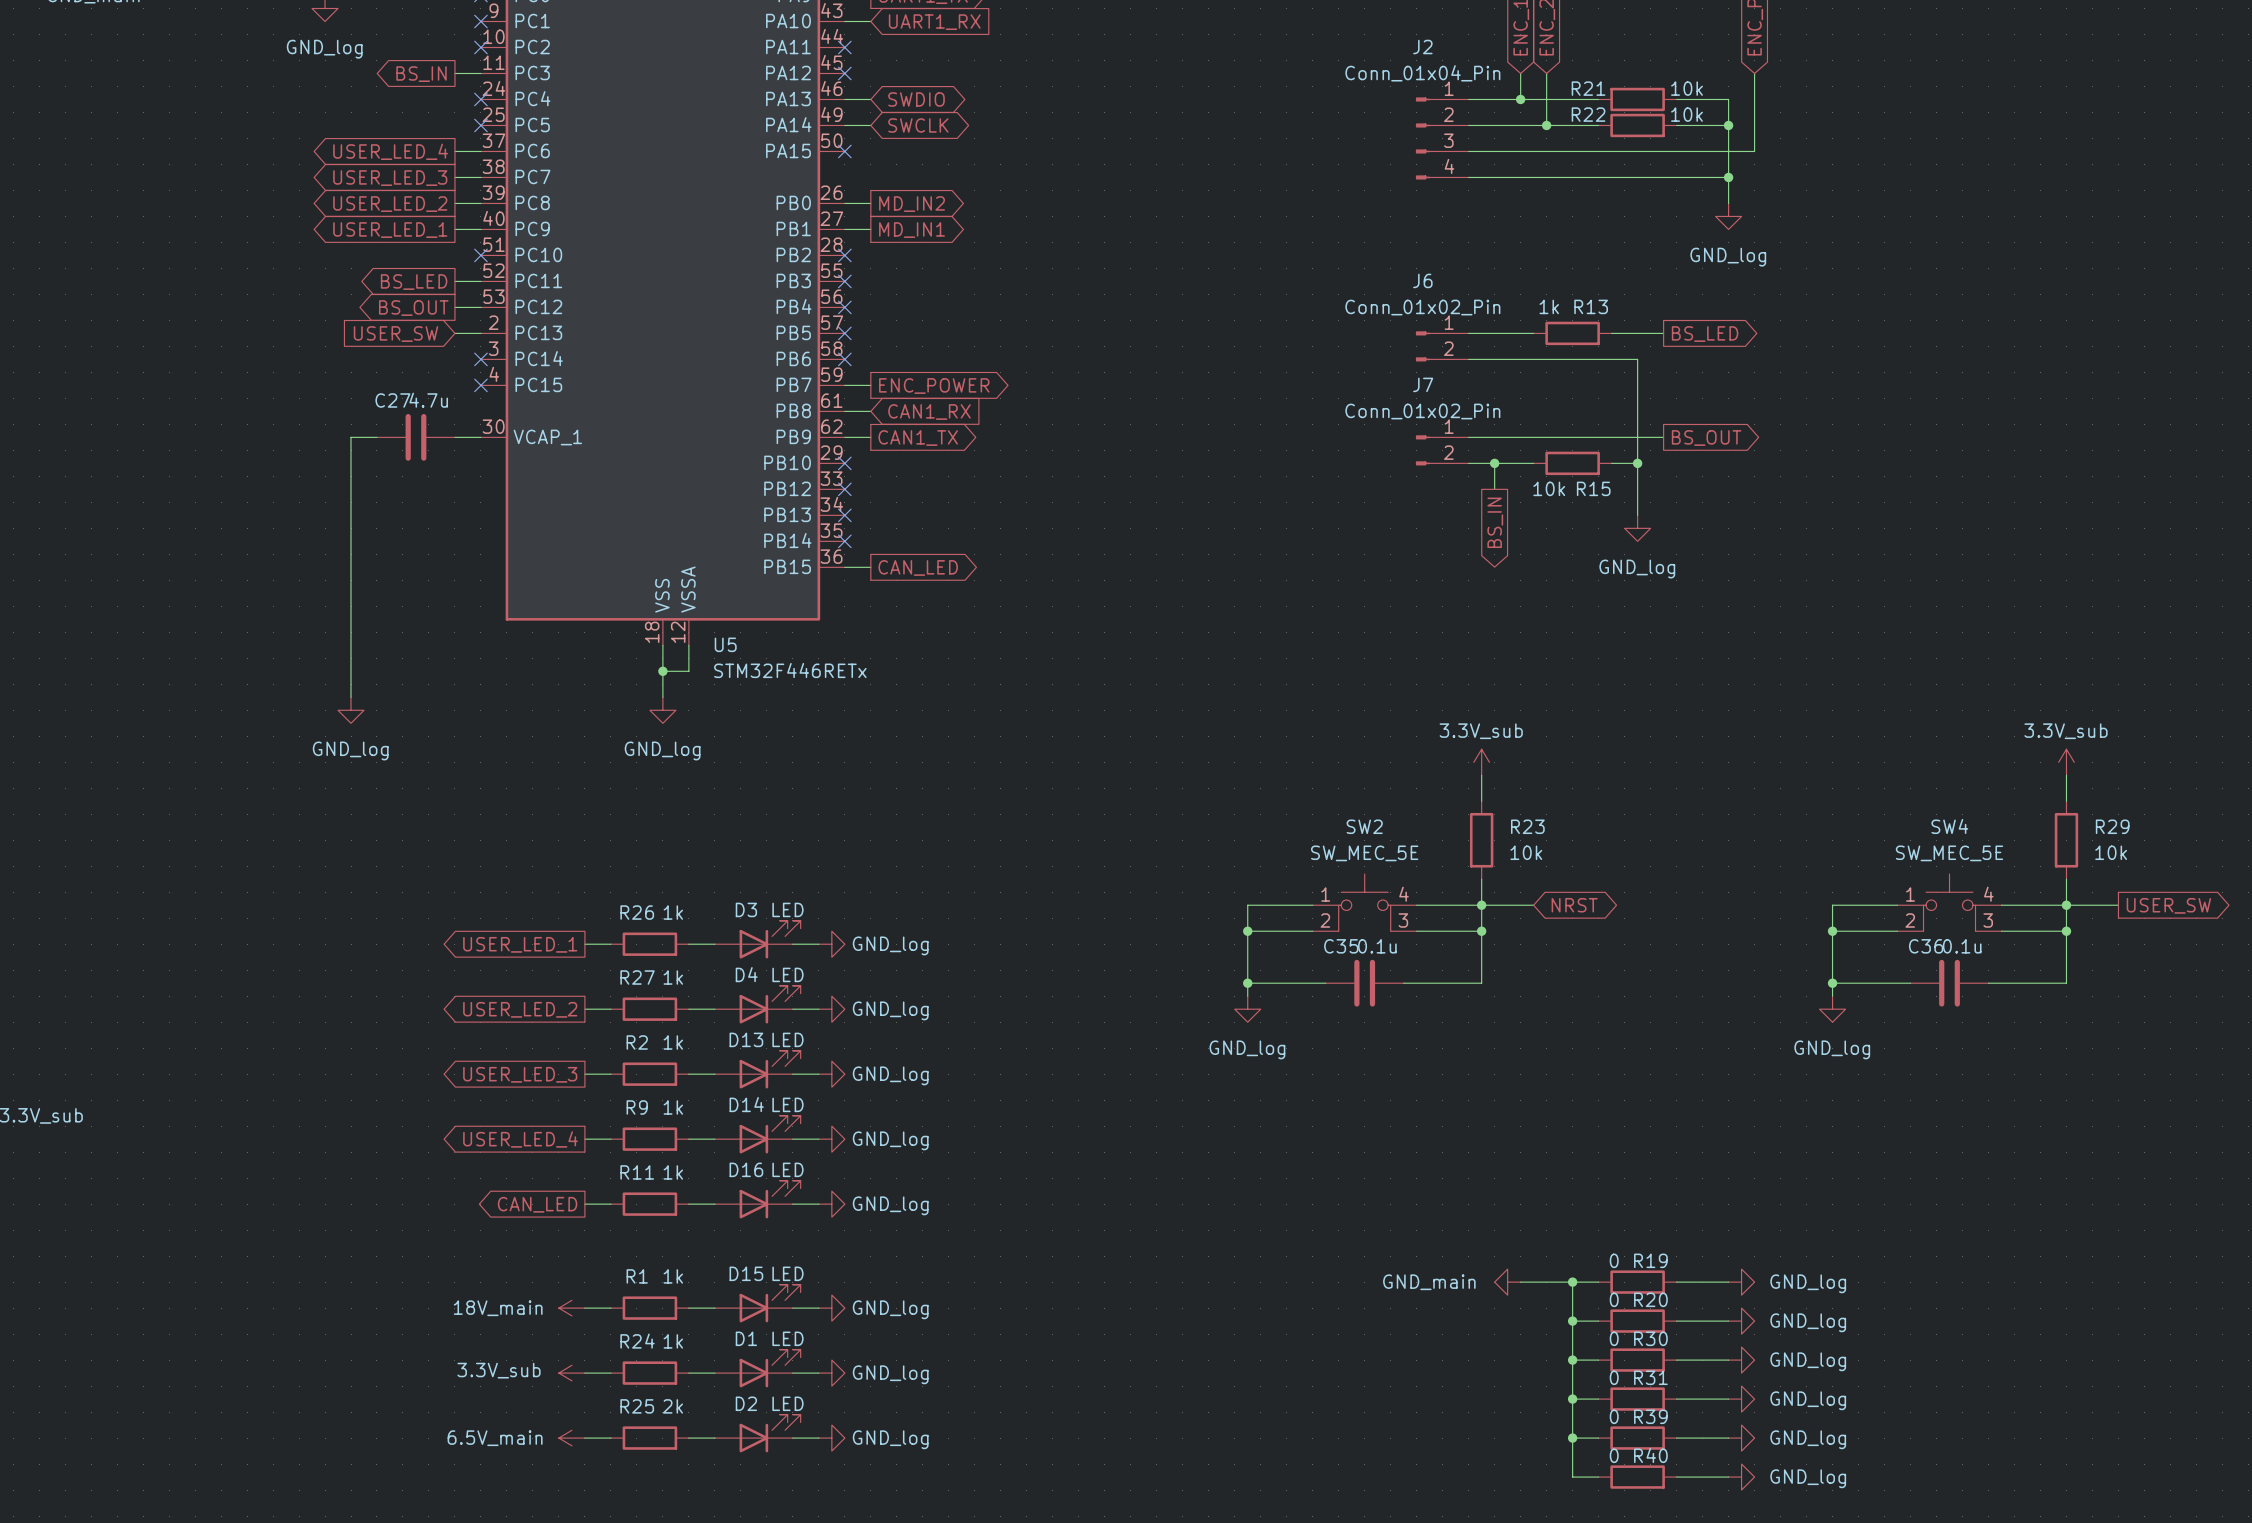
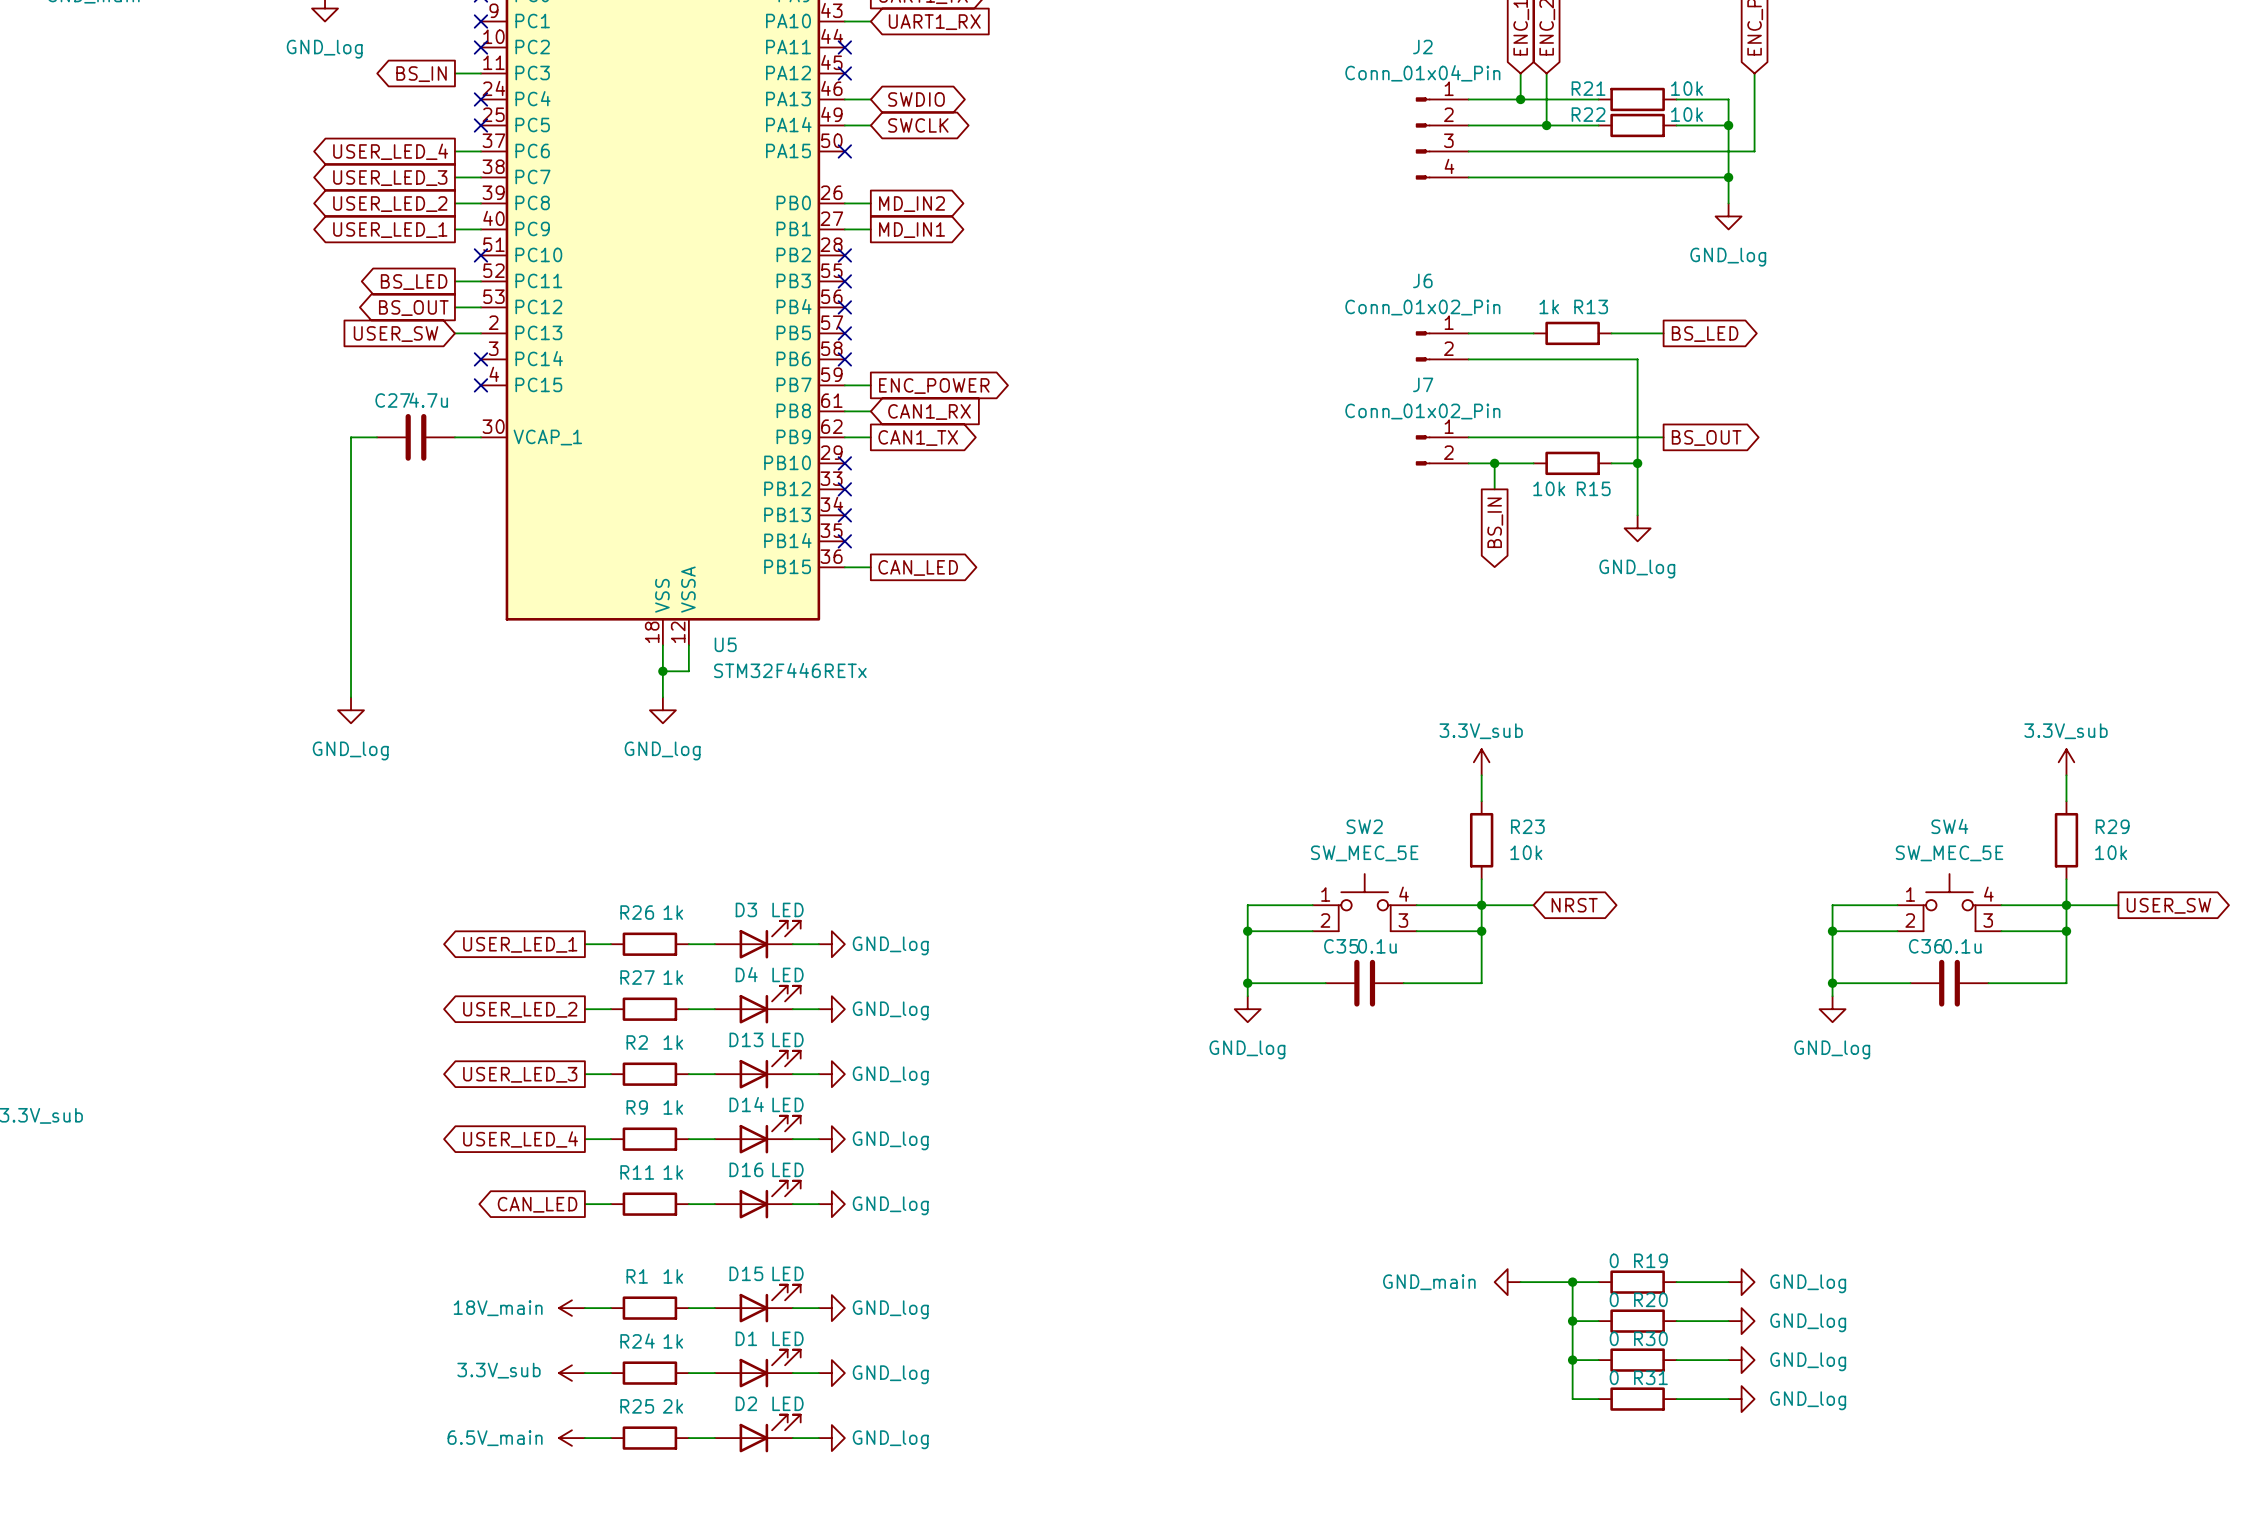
wire: (1572, 1399) (1572, 1477) (1598, 1477) -> none
junction: (1572, 1399) -> none
wire: (1572, 1438) (1598, 1438) -> none
junction: (1572, 1438) -> none
R39: 0 (1637, 1438) -> none
wire: (1676, 1438) (1728, 1438) -> none
power symbol: GND_log (1741, 1438) -> none
R40: 0 (1637, 1477) -> none
wire: (1676, 1477) (1728, 1477) -> none
power symbol: GND_log (1741, 1477) -> none

